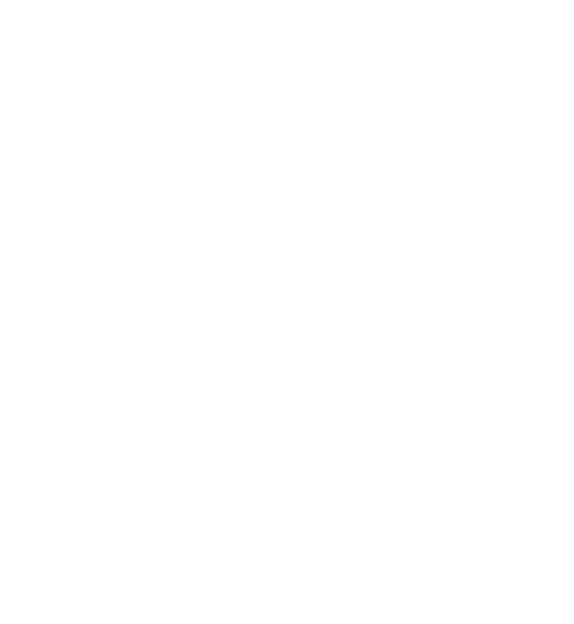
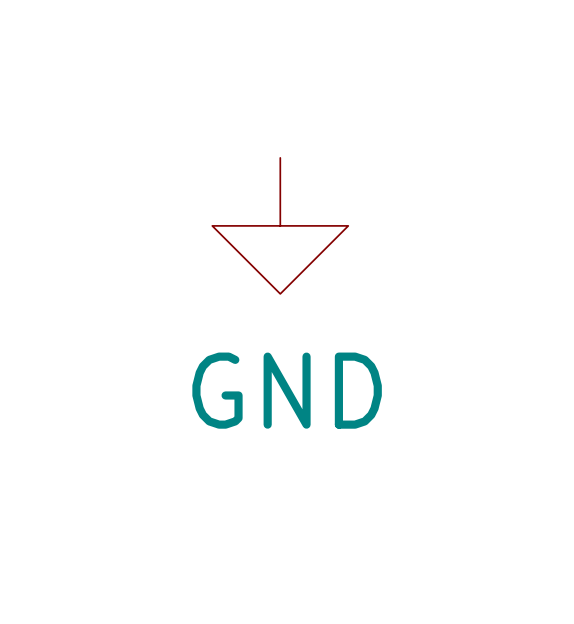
power symbol: none -> GND (280, 225)

